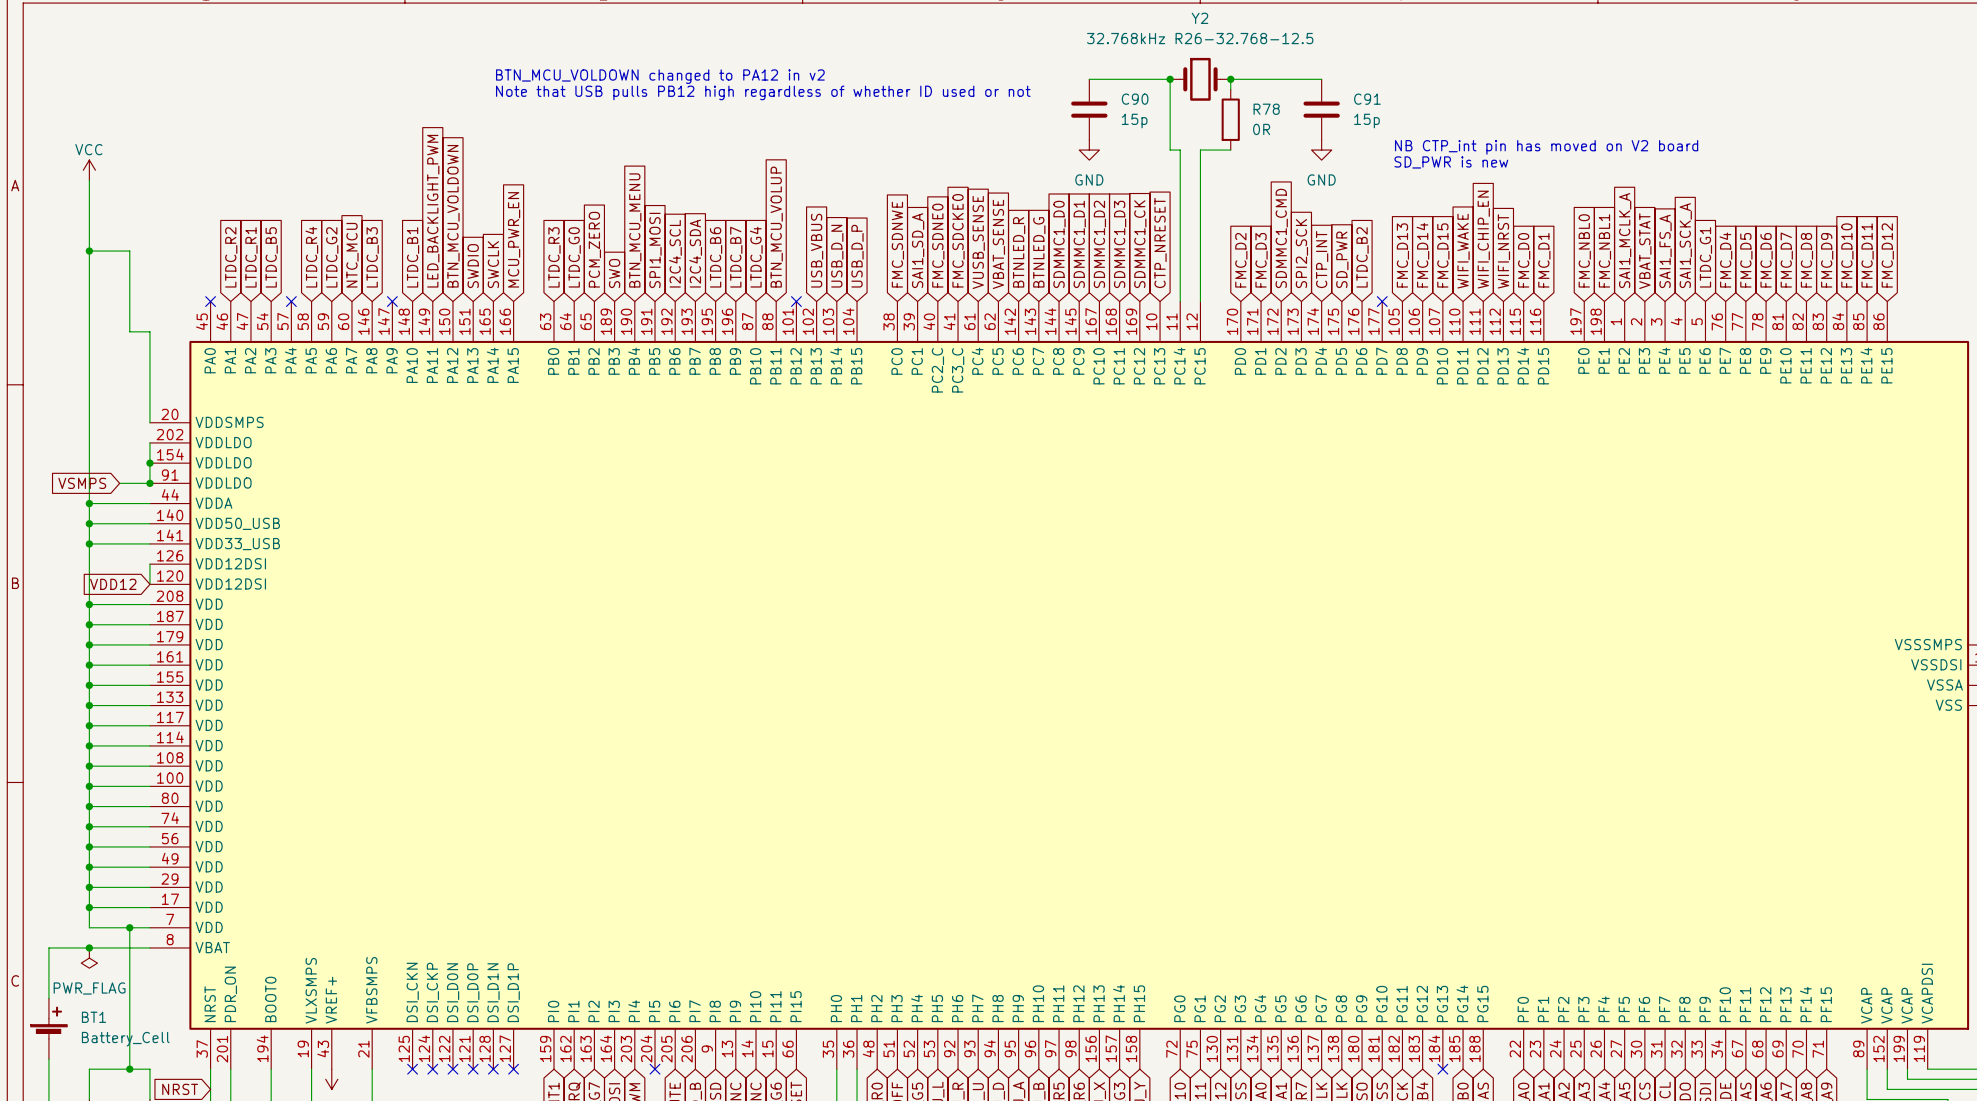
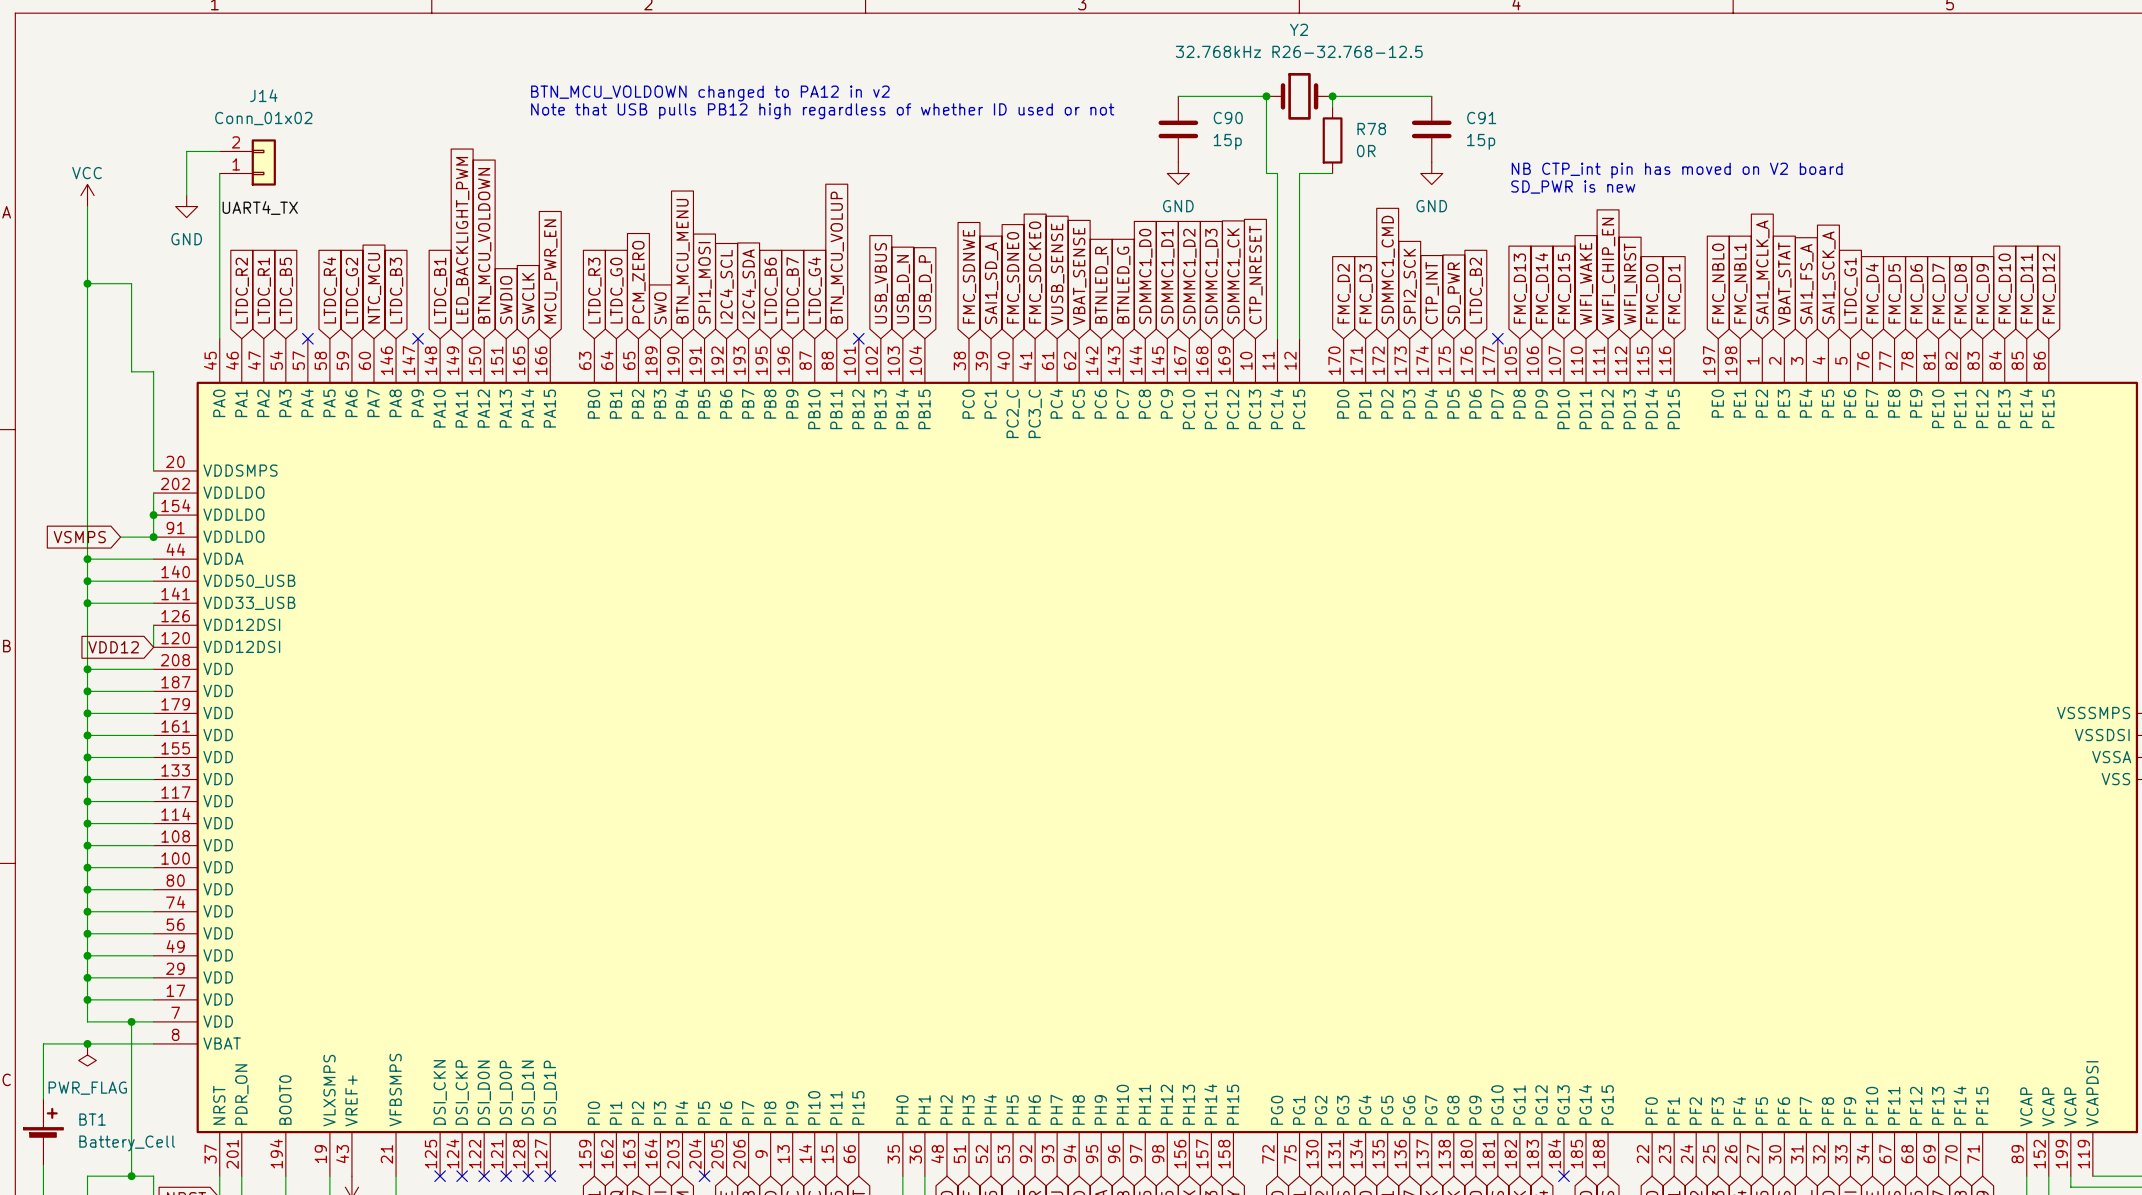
wire: none -> (219, 151) (186, 151) (186, 195)
J14: none -> Conn_01x02 (247, 162)
wire: none -> (219, 173) (219, 338)
power symbol: none -> GND (186, 206)
label: none -> UART4_TX (260, 208)
no-connect mark: (210, 301) -> none

